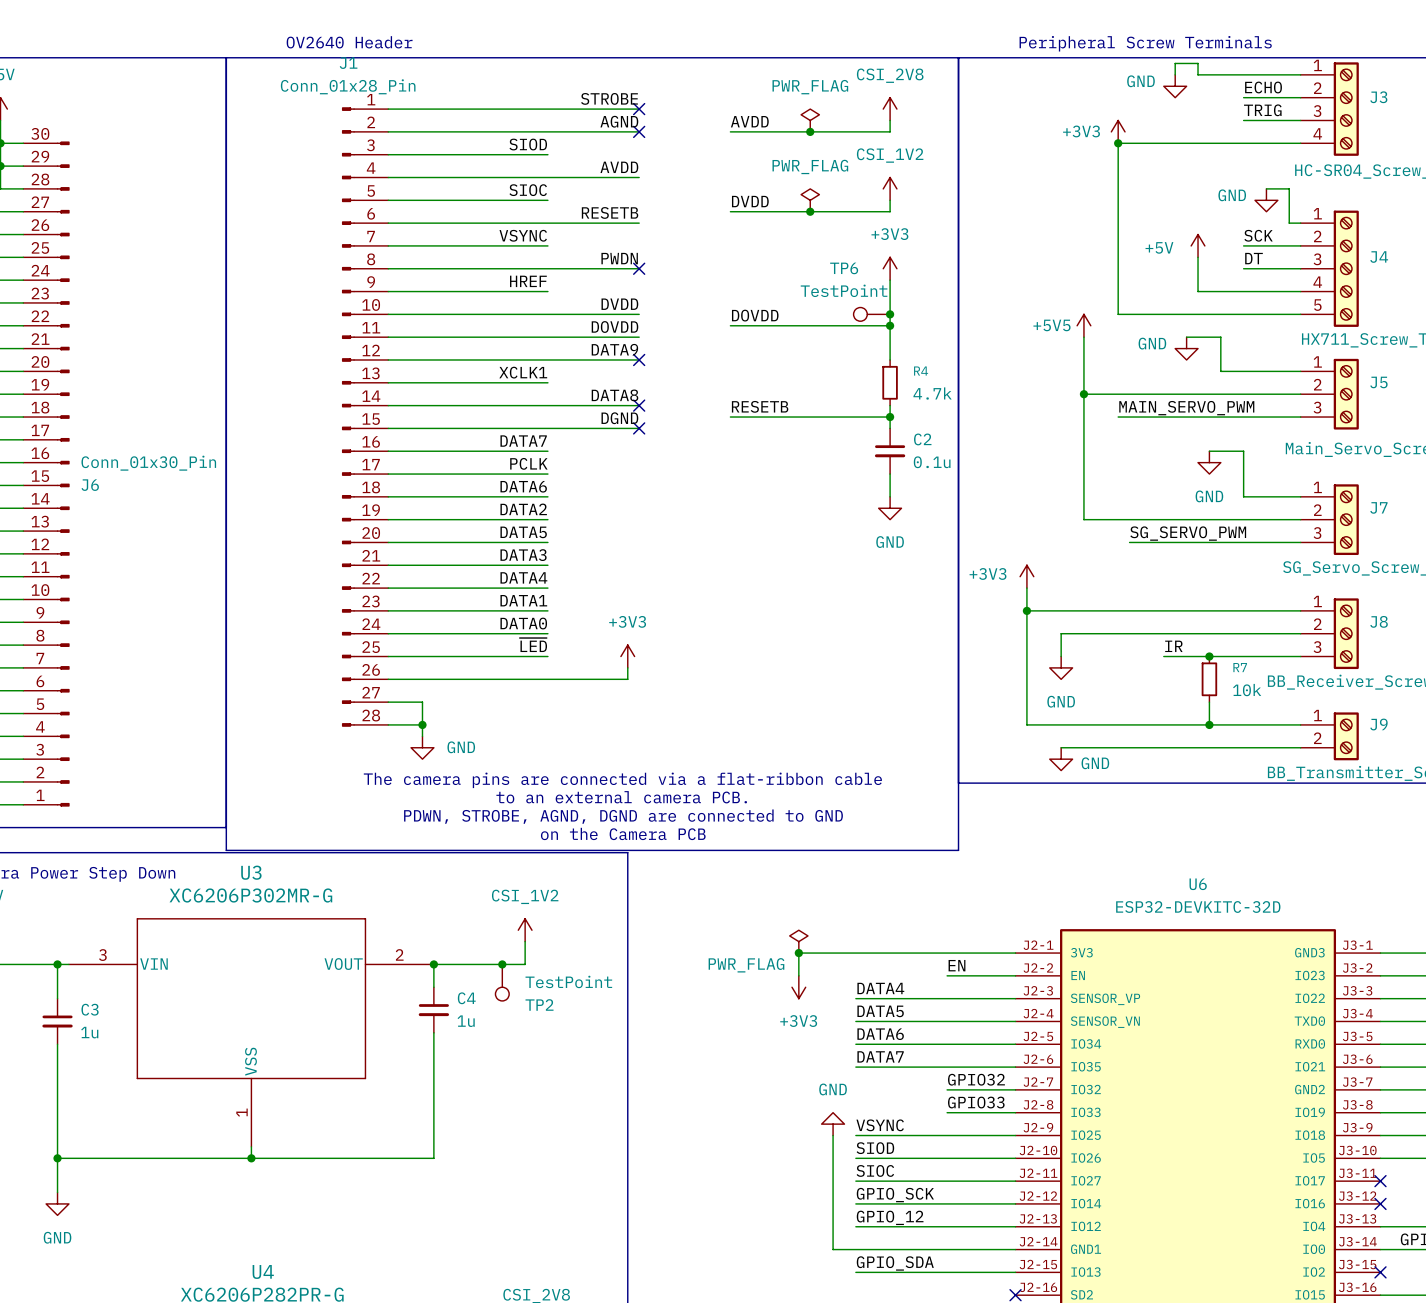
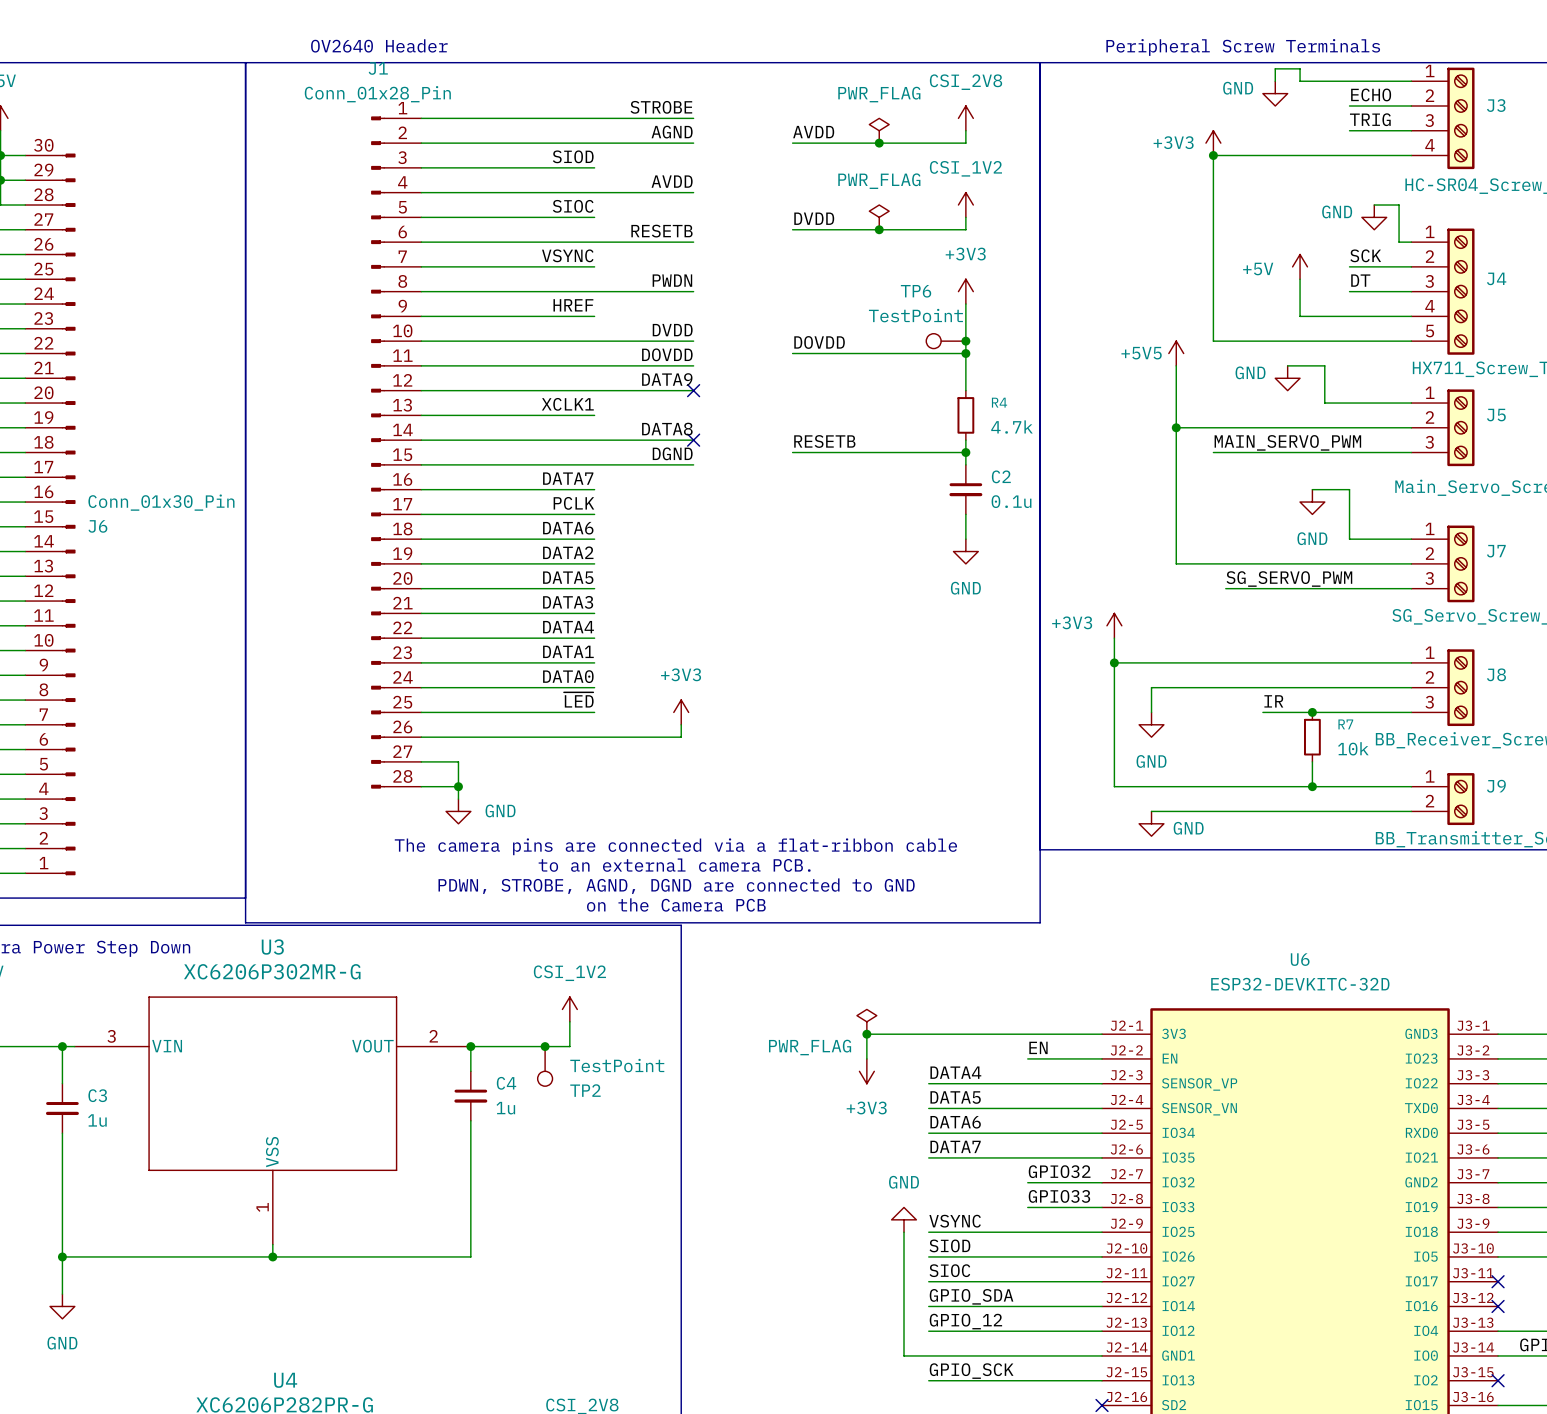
no-connect mark: (639, 109) -> none
no-connect mark: (639, 131) -> none
no-connect mark: (639, 268) -> none
no-connect mark: (639, 428) -> none
label: GPIO_SCK (895, 1195) -> GPIO_SDA (971, 1296)
label: GPIO_SDA (895, 1263) -> GPIO_SCK (971, 1371)

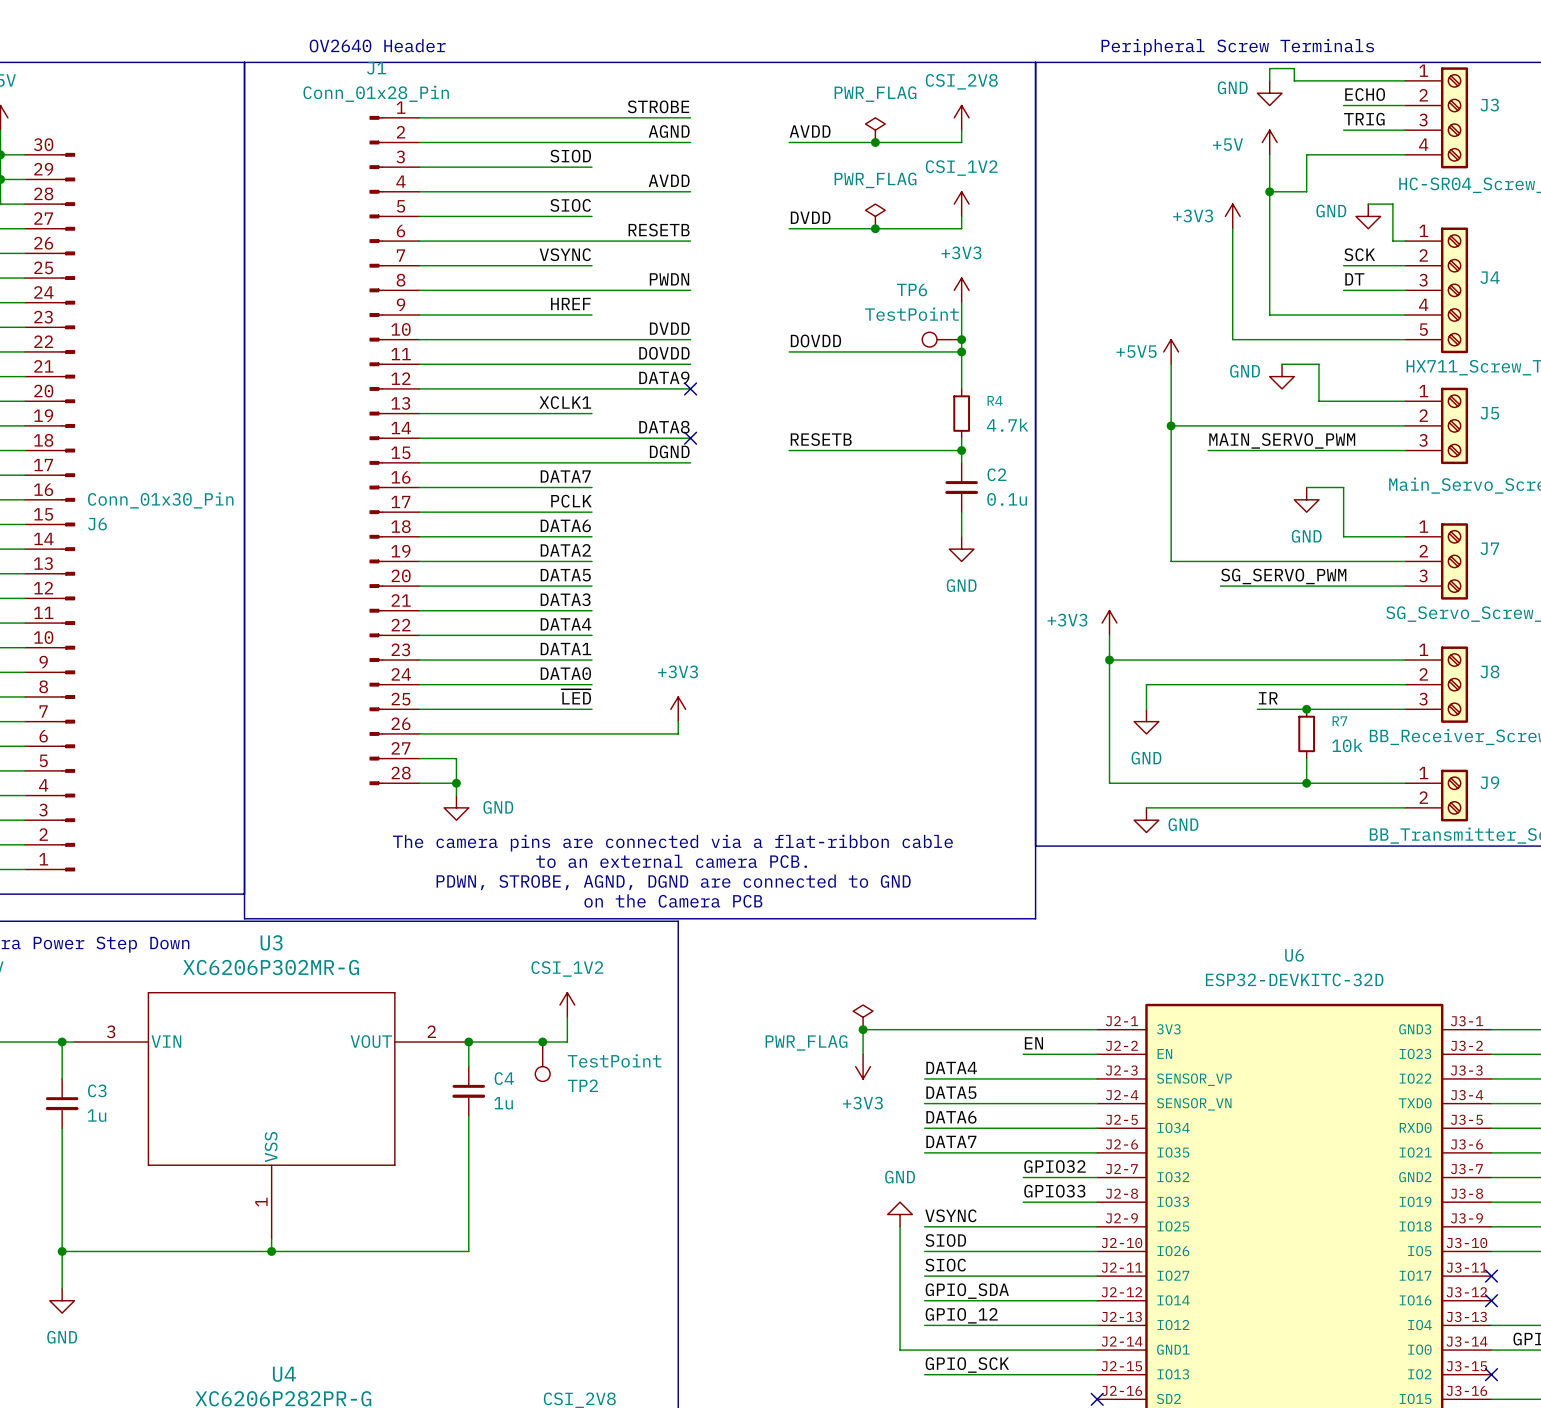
power symbol position: +3V3 (1213, 143) -> +3V3 (1232, 216)
junction: (1213, 155) -> none
wire: (1312, 155) (1213, 155) (1213, 341) (1238, 341) -> (1232, 228) (1232, 339)
wire: none -> (1306, 154) (1306, 191) (1269, 191)
junction: none -> (1269, 191)
power symbol position: +5V (1300, 266) -> +5V (1269, 142)
wire: (1300, 279) (1300, 316) -> (1269, 154) (1269, 315) (1294, 315)

